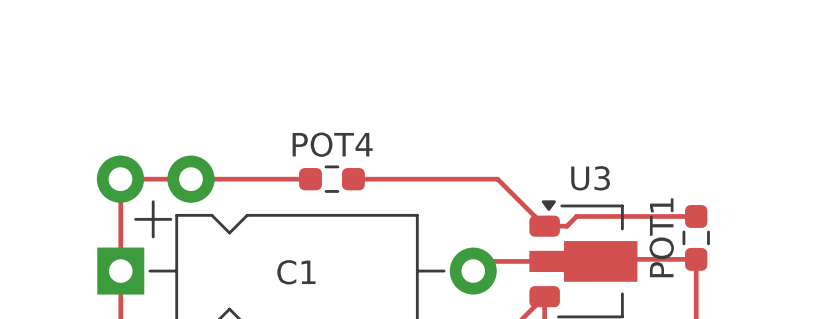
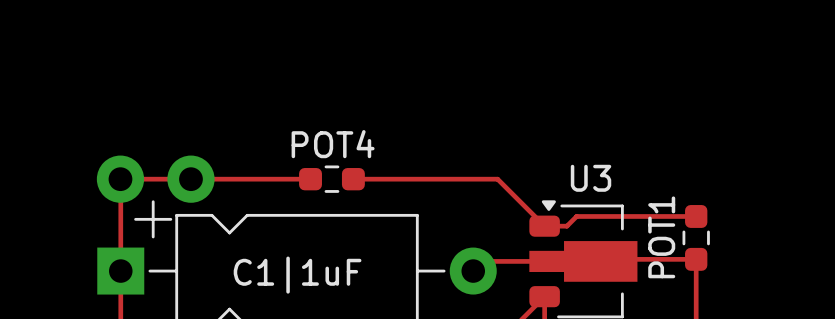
C1 name: C1 (296, 272) -> C1|1uF (297, 275)

